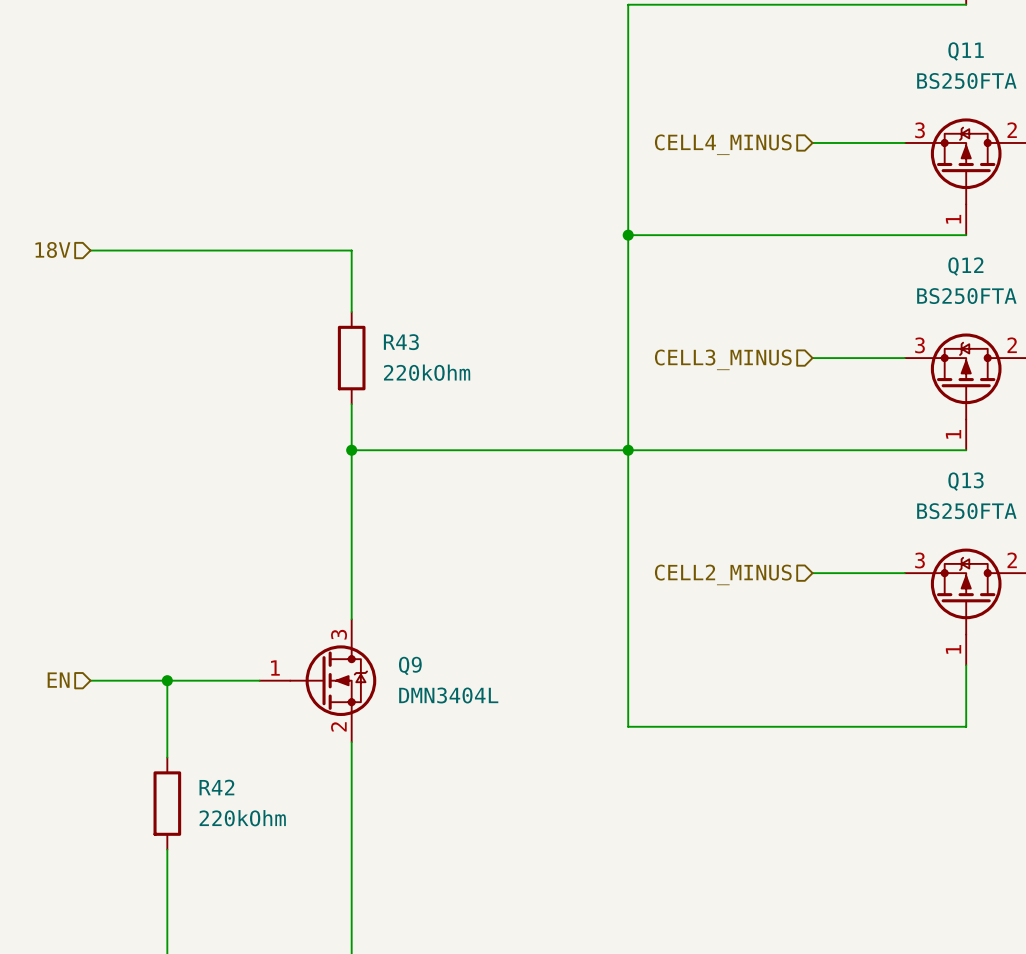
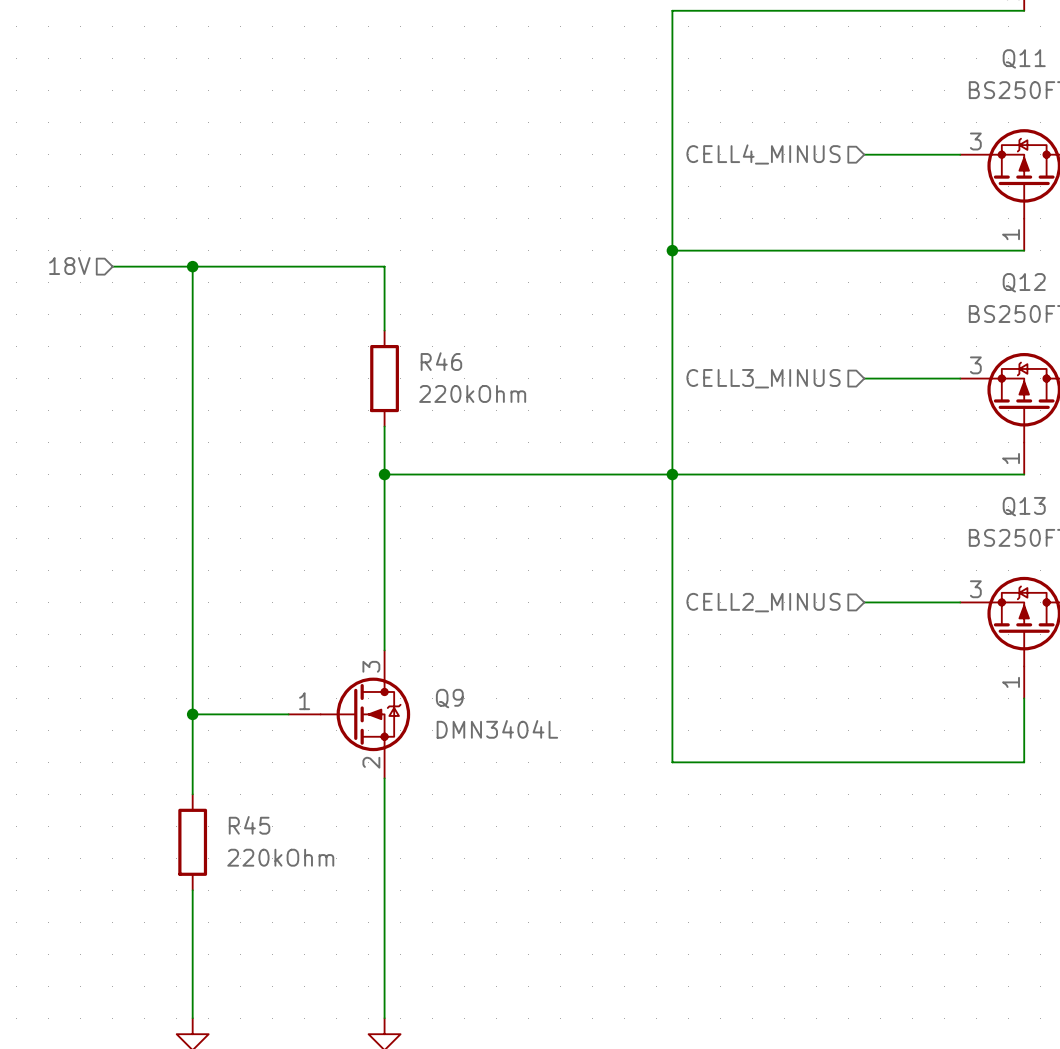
junction: none -> (192, 266)
R43 name: R43 (401, 342) -> R46 (441, 361)
hierarchical label: EN (58, 680) -> none
wire: (90, 680) (167, 680) -> (192, 266) (192, 714)
R42 name: R42 (216, 787) -> R45 (249, 825)

